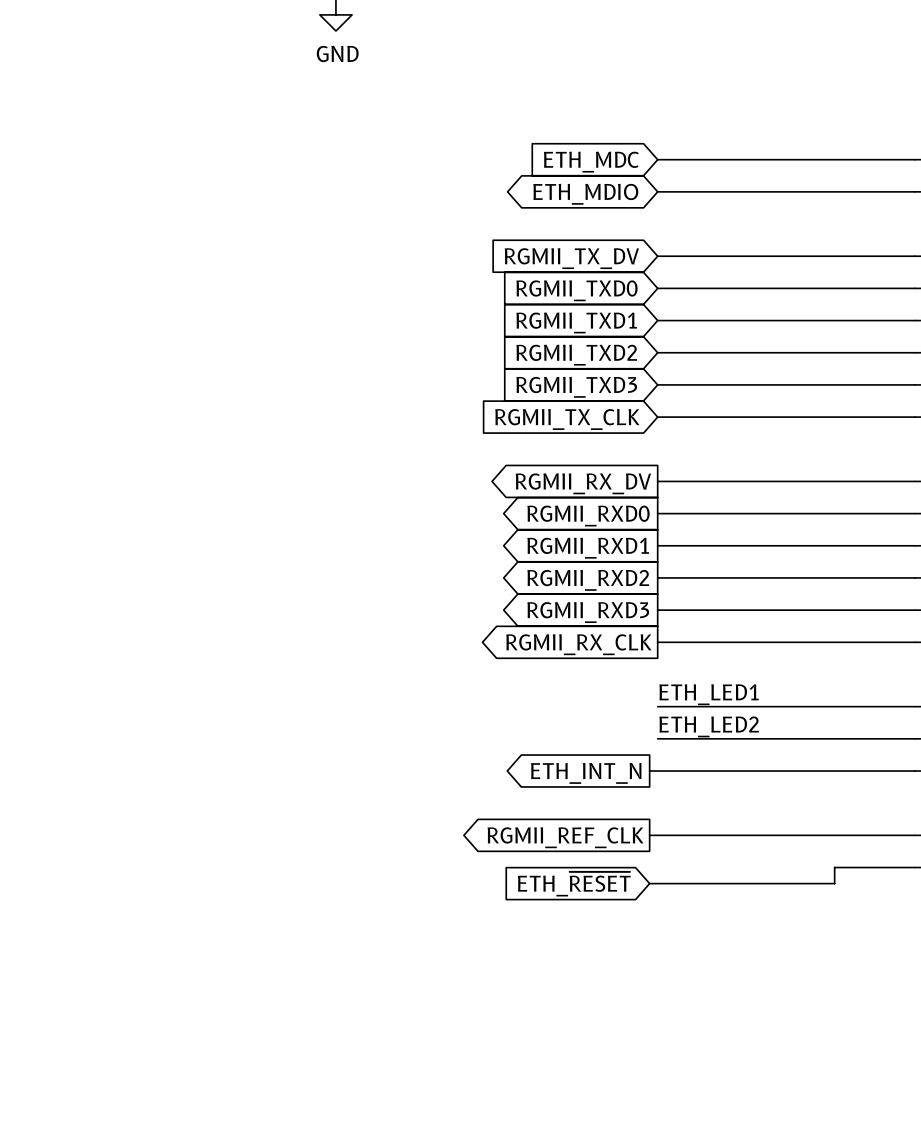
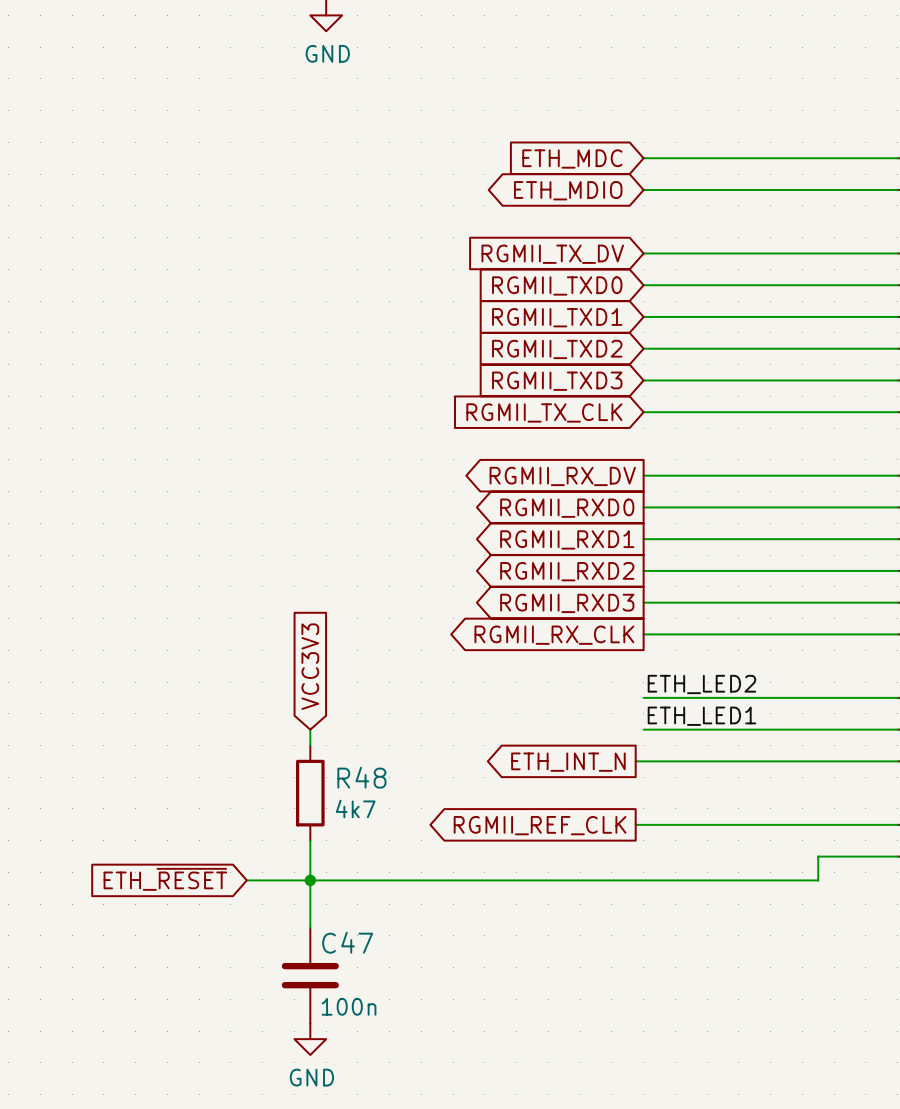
global label: none -> VCC3V3 (310, 666)
label: ETH_LED1 (709, 694) -> ETH_LED2 (701, 684)
label: ETH_LED2 (709, 726) -> ETH_LED1 (701, 716)
wire: none -> (310, 729) (310, 745)
R48: none -> (310, 793)
wire: none -> (310, 840) (310, 928)
wire: (649, 883) (834, 883) -> (246, 880) (818, 880) (818, 872)
global label: ETH_~{RESET} (574, 884) -> none
junction: none -> (310, 880)
global label: none -> ETH_~{RESET} (165, 879)
C47: none -> (310, 975)
power symbol: none -> GND (310, 1039)

